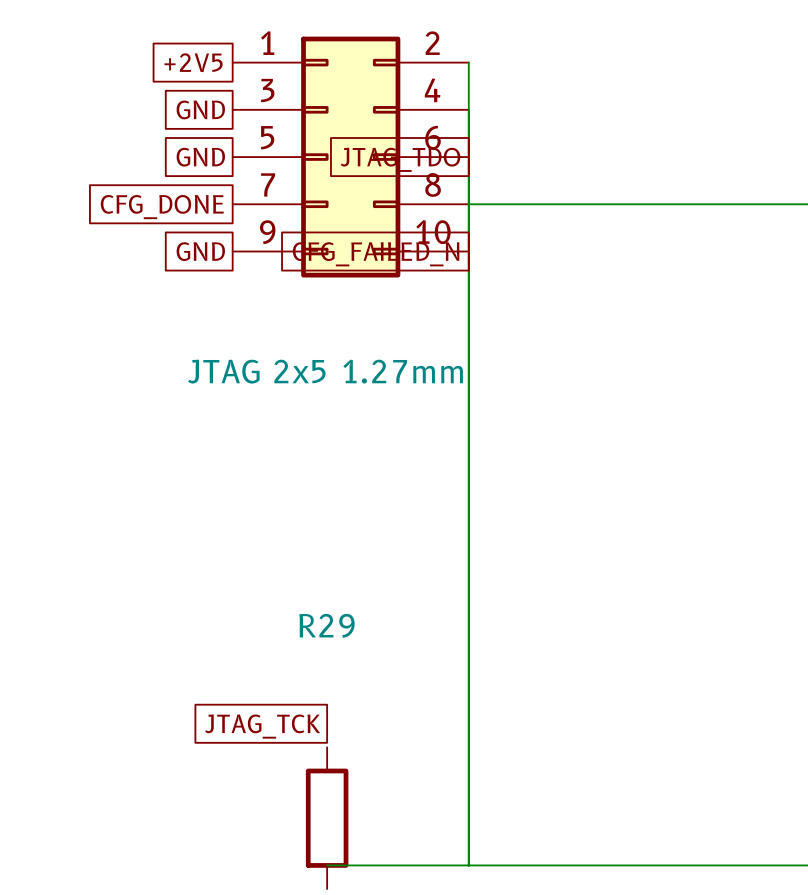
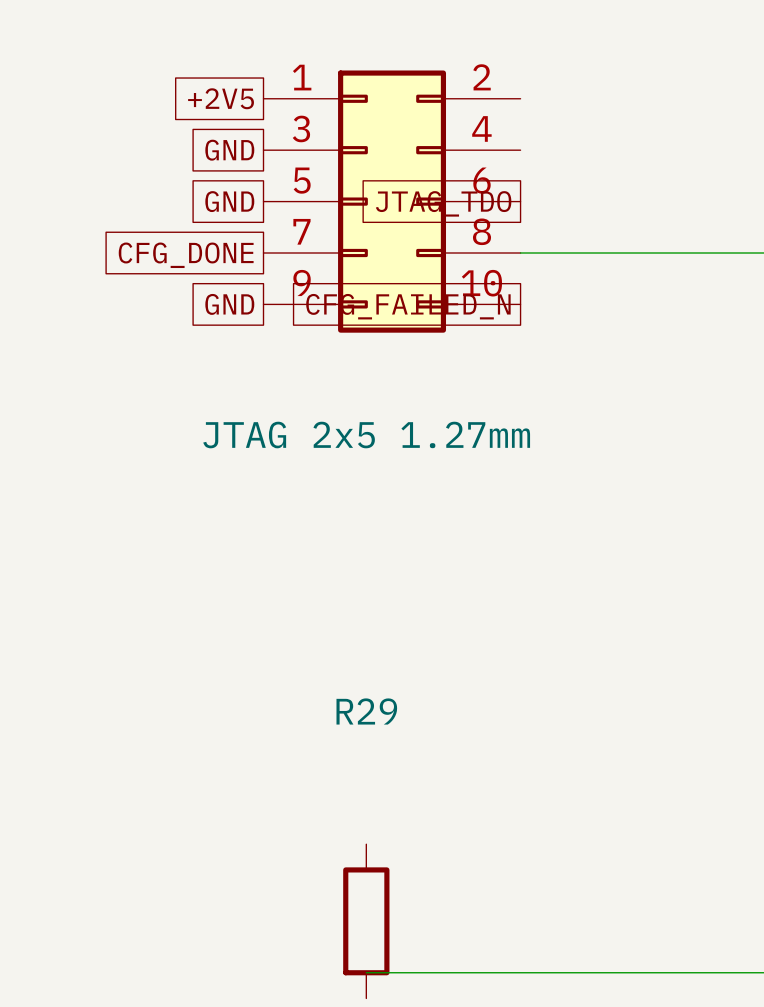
wire: (468, 62) (468, 865) -> none
global label: JTAG_TCK (262, 726) -> none

